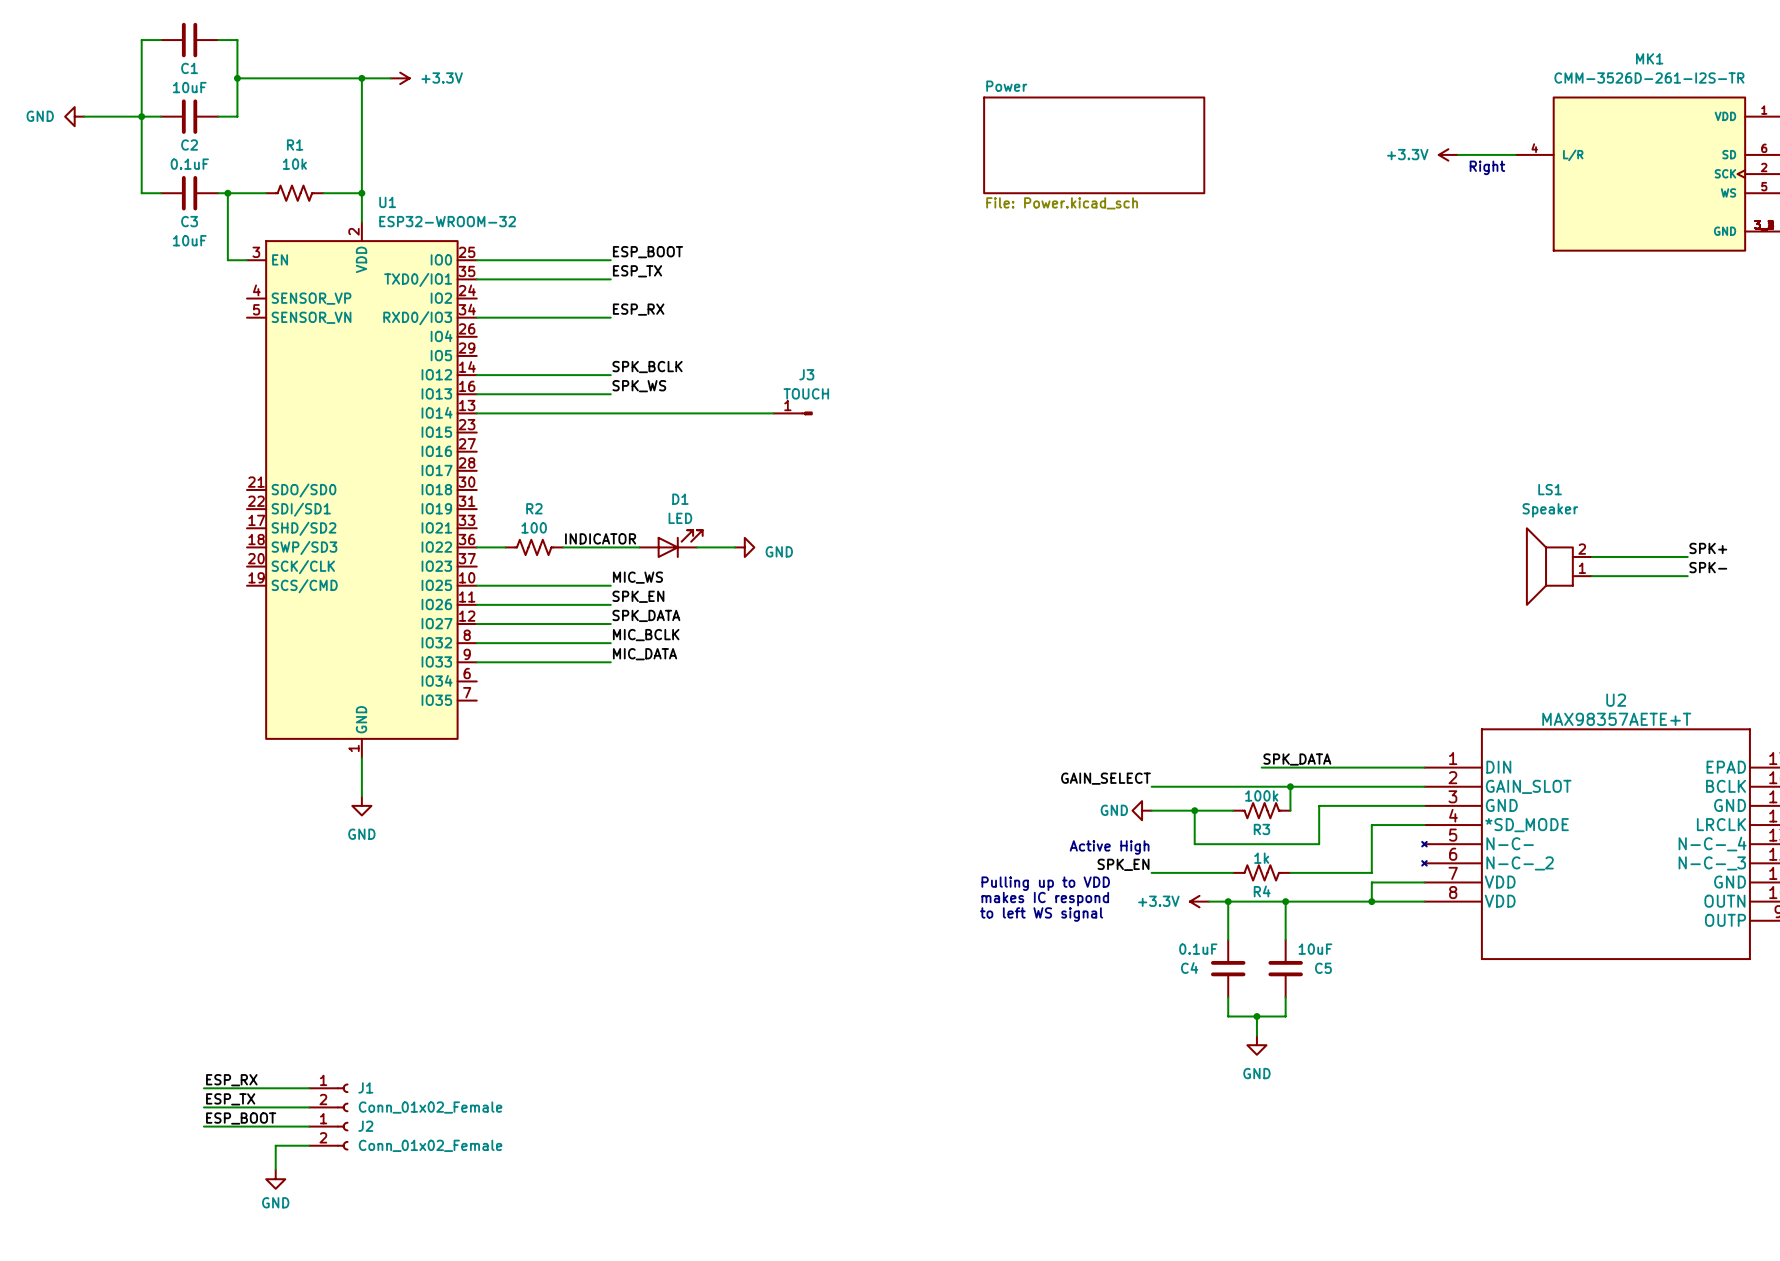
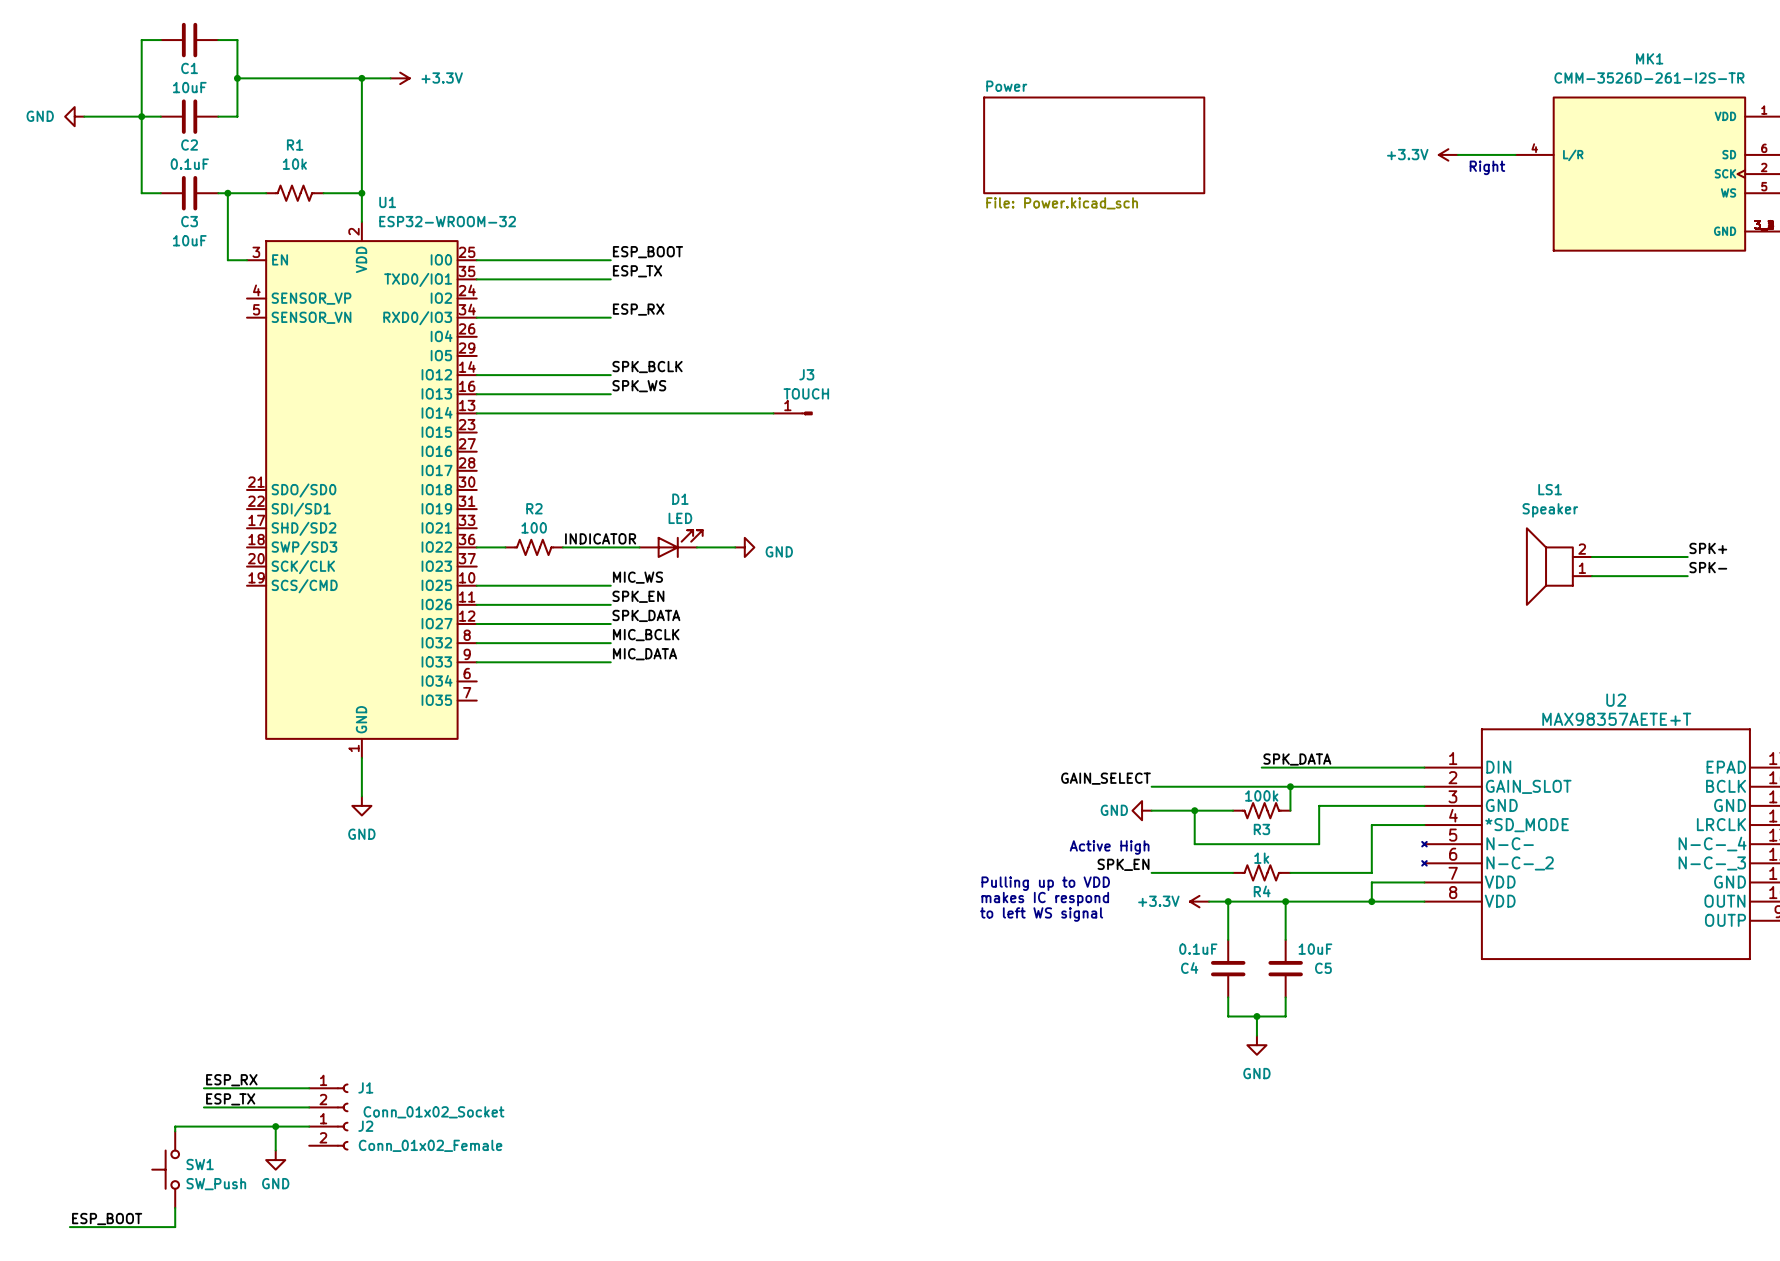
J1 value: Conn_01x02_Female (430, 1107) -> Conn_01x02_Socket (433, 1112)
label position: ESP_BOOT (241, 1118) -> ESP_BOOT (107, 1219)
wire: none -> (203, 1126) (175, 1126) (175, 1131)
junction: none -> (275, 1126)
wire: (275, 1145) (309, 1145) -> (275, 1145) (275, 1126)
SW1: none -> SW_Push (165, 1169)
power symbol position: GND (275, 1179) -> GND (275, 1160)
wire: none -> (175, 1207) (175, 1227) (69, 1227)

